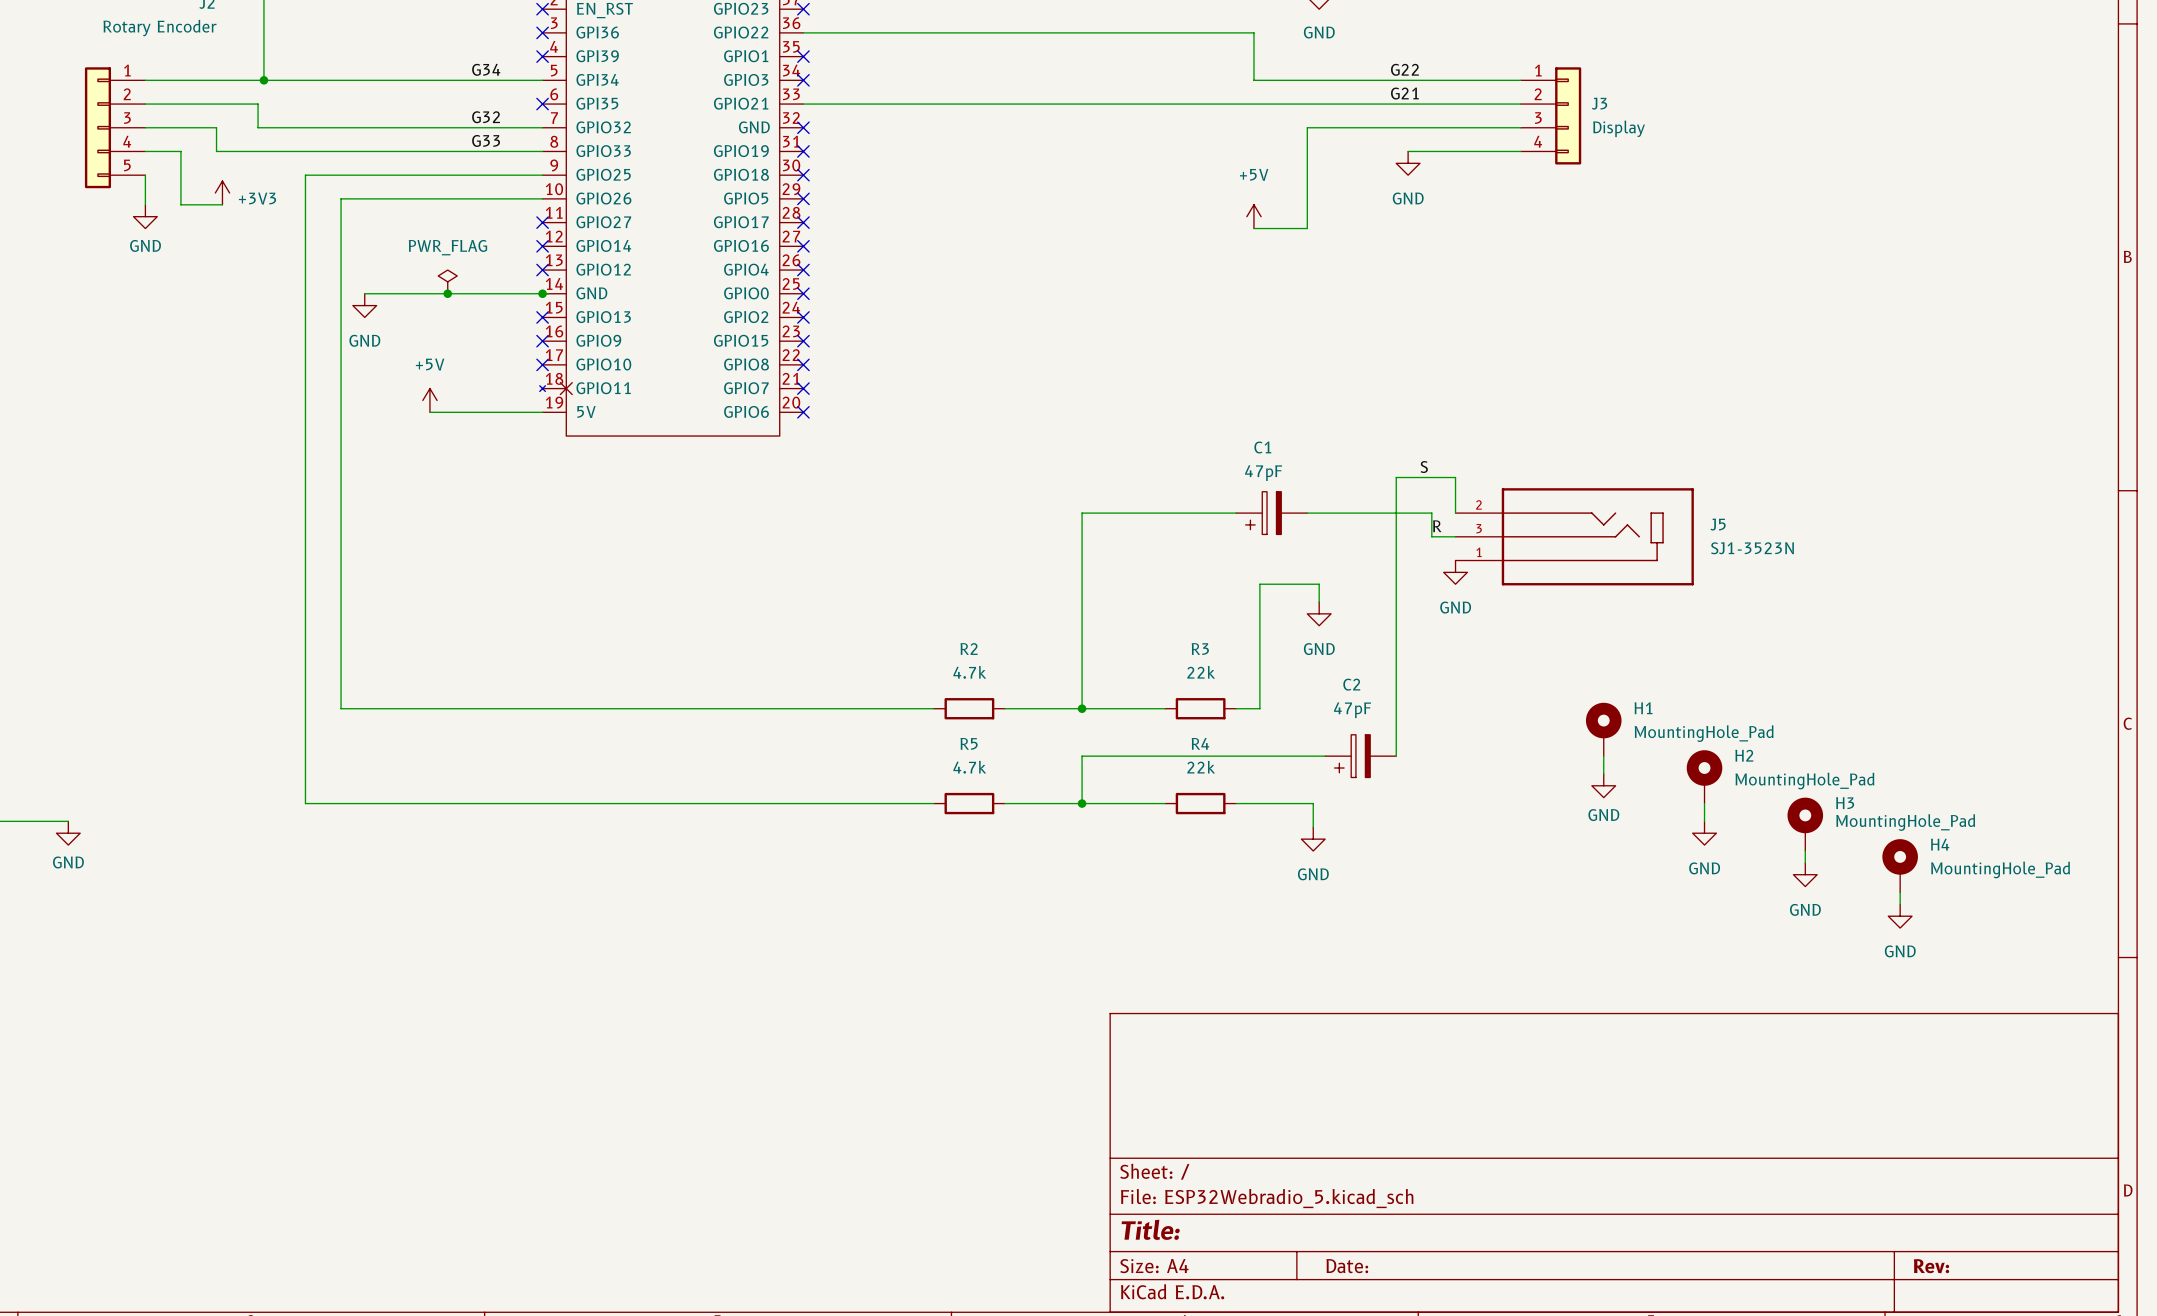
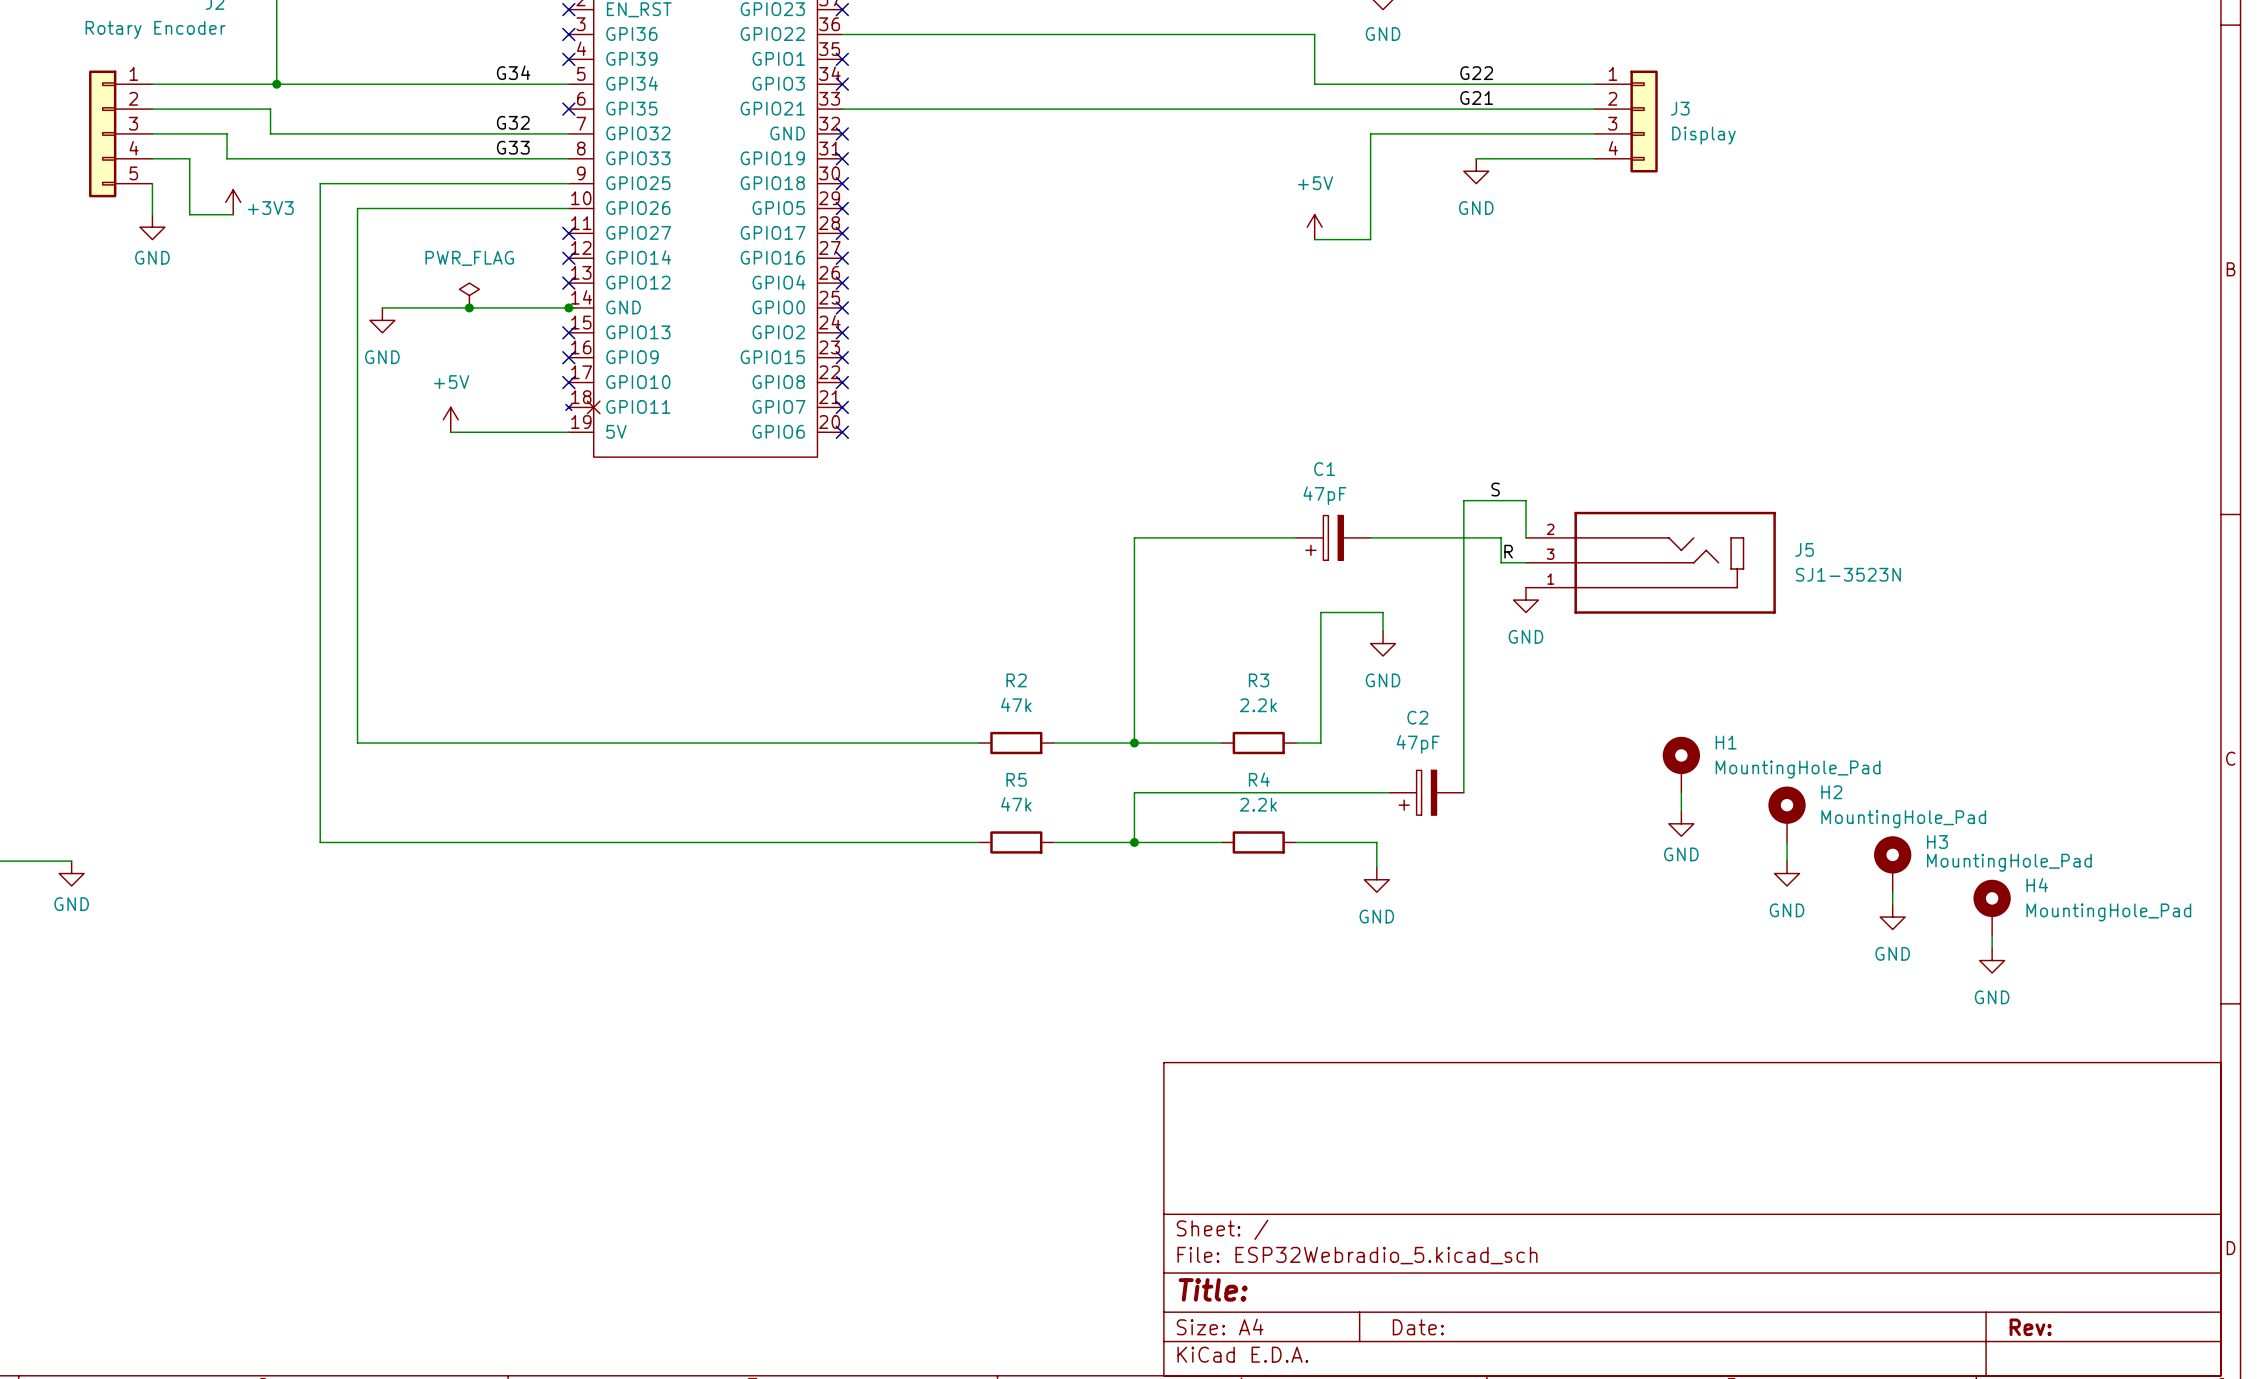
R2 value: 4.7k (969, 672) -> 47k (1016, 704)
R3 value: 22k (1201, 672) -> 2.2k (1258, 705)
R5 value: 4.7k (969, 767) -> 47k (1016, 804)
R4 value: 22k (1201, 767) -> 2.2k (1258, 804)

